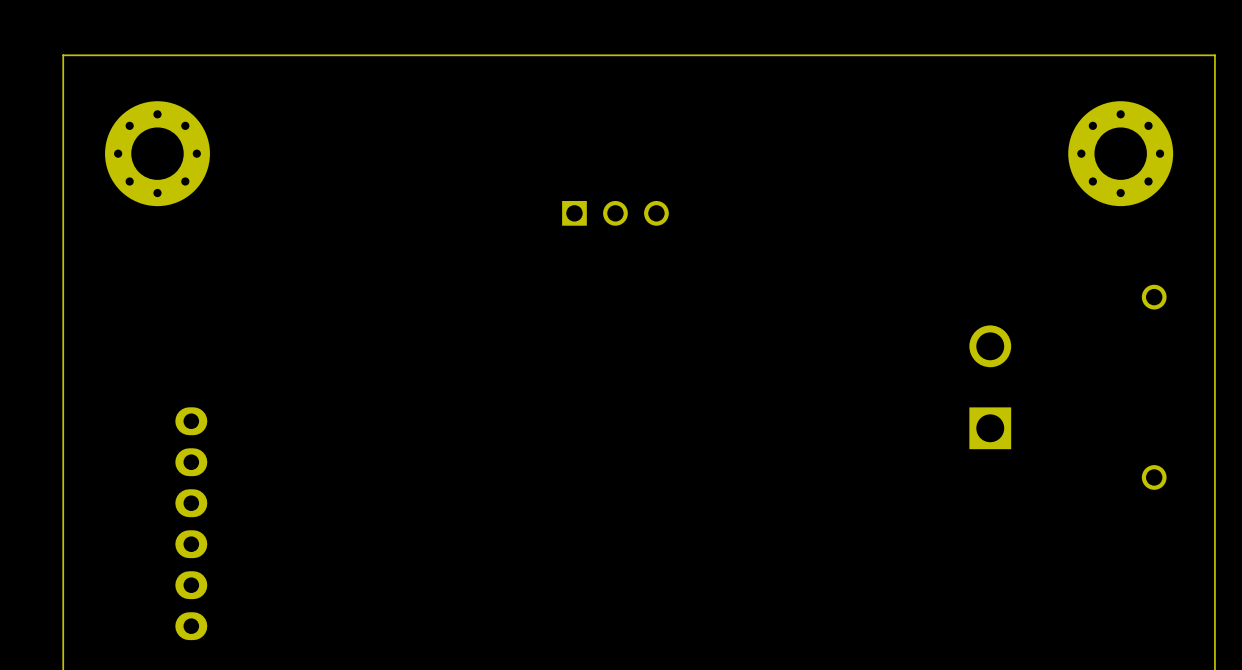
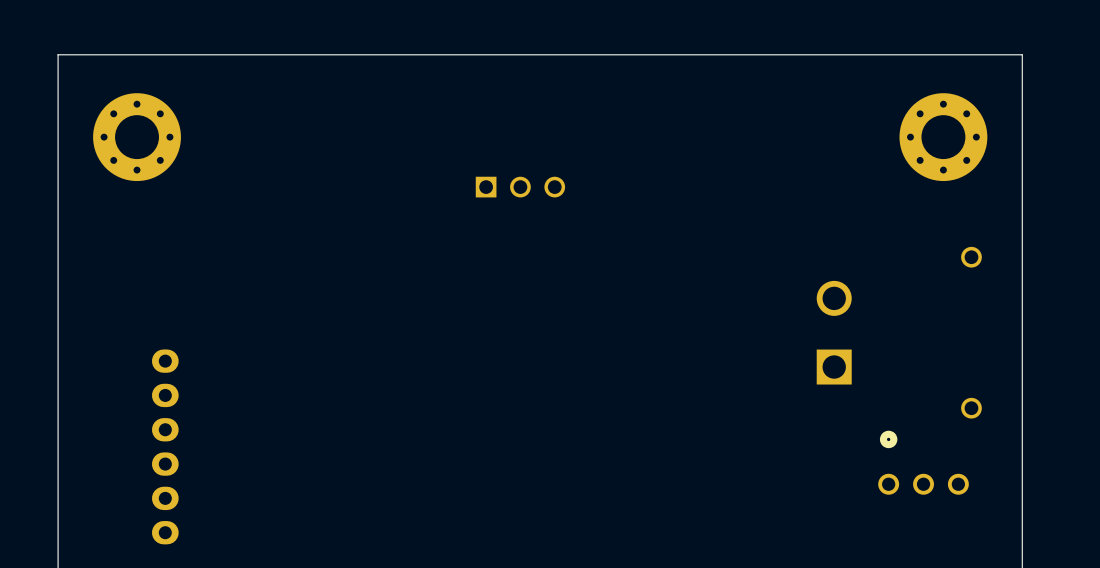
part: none -> (923, 462)

